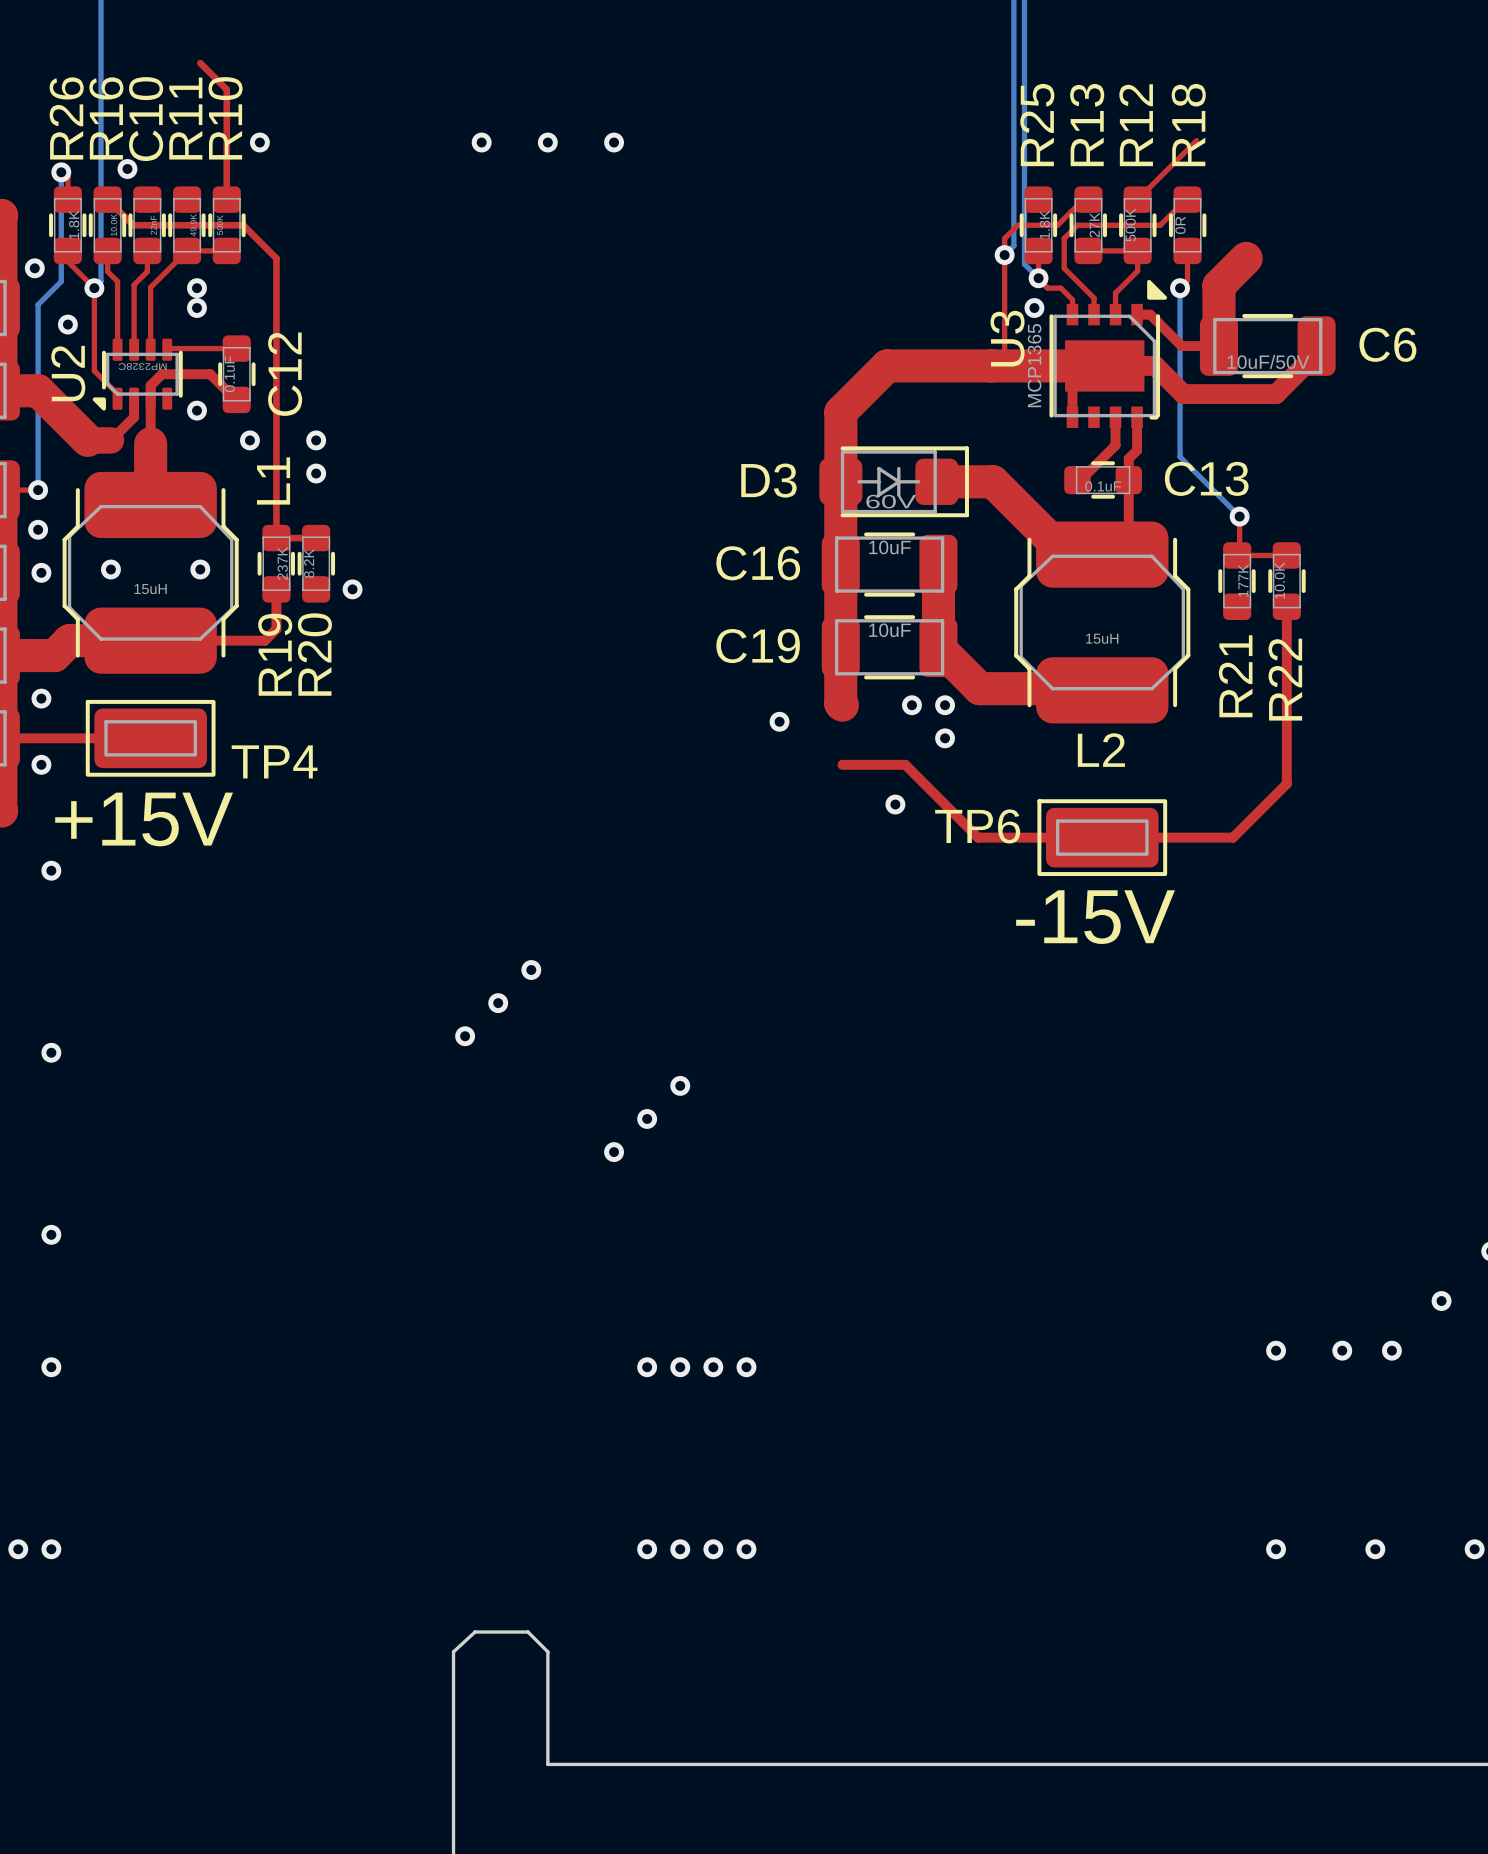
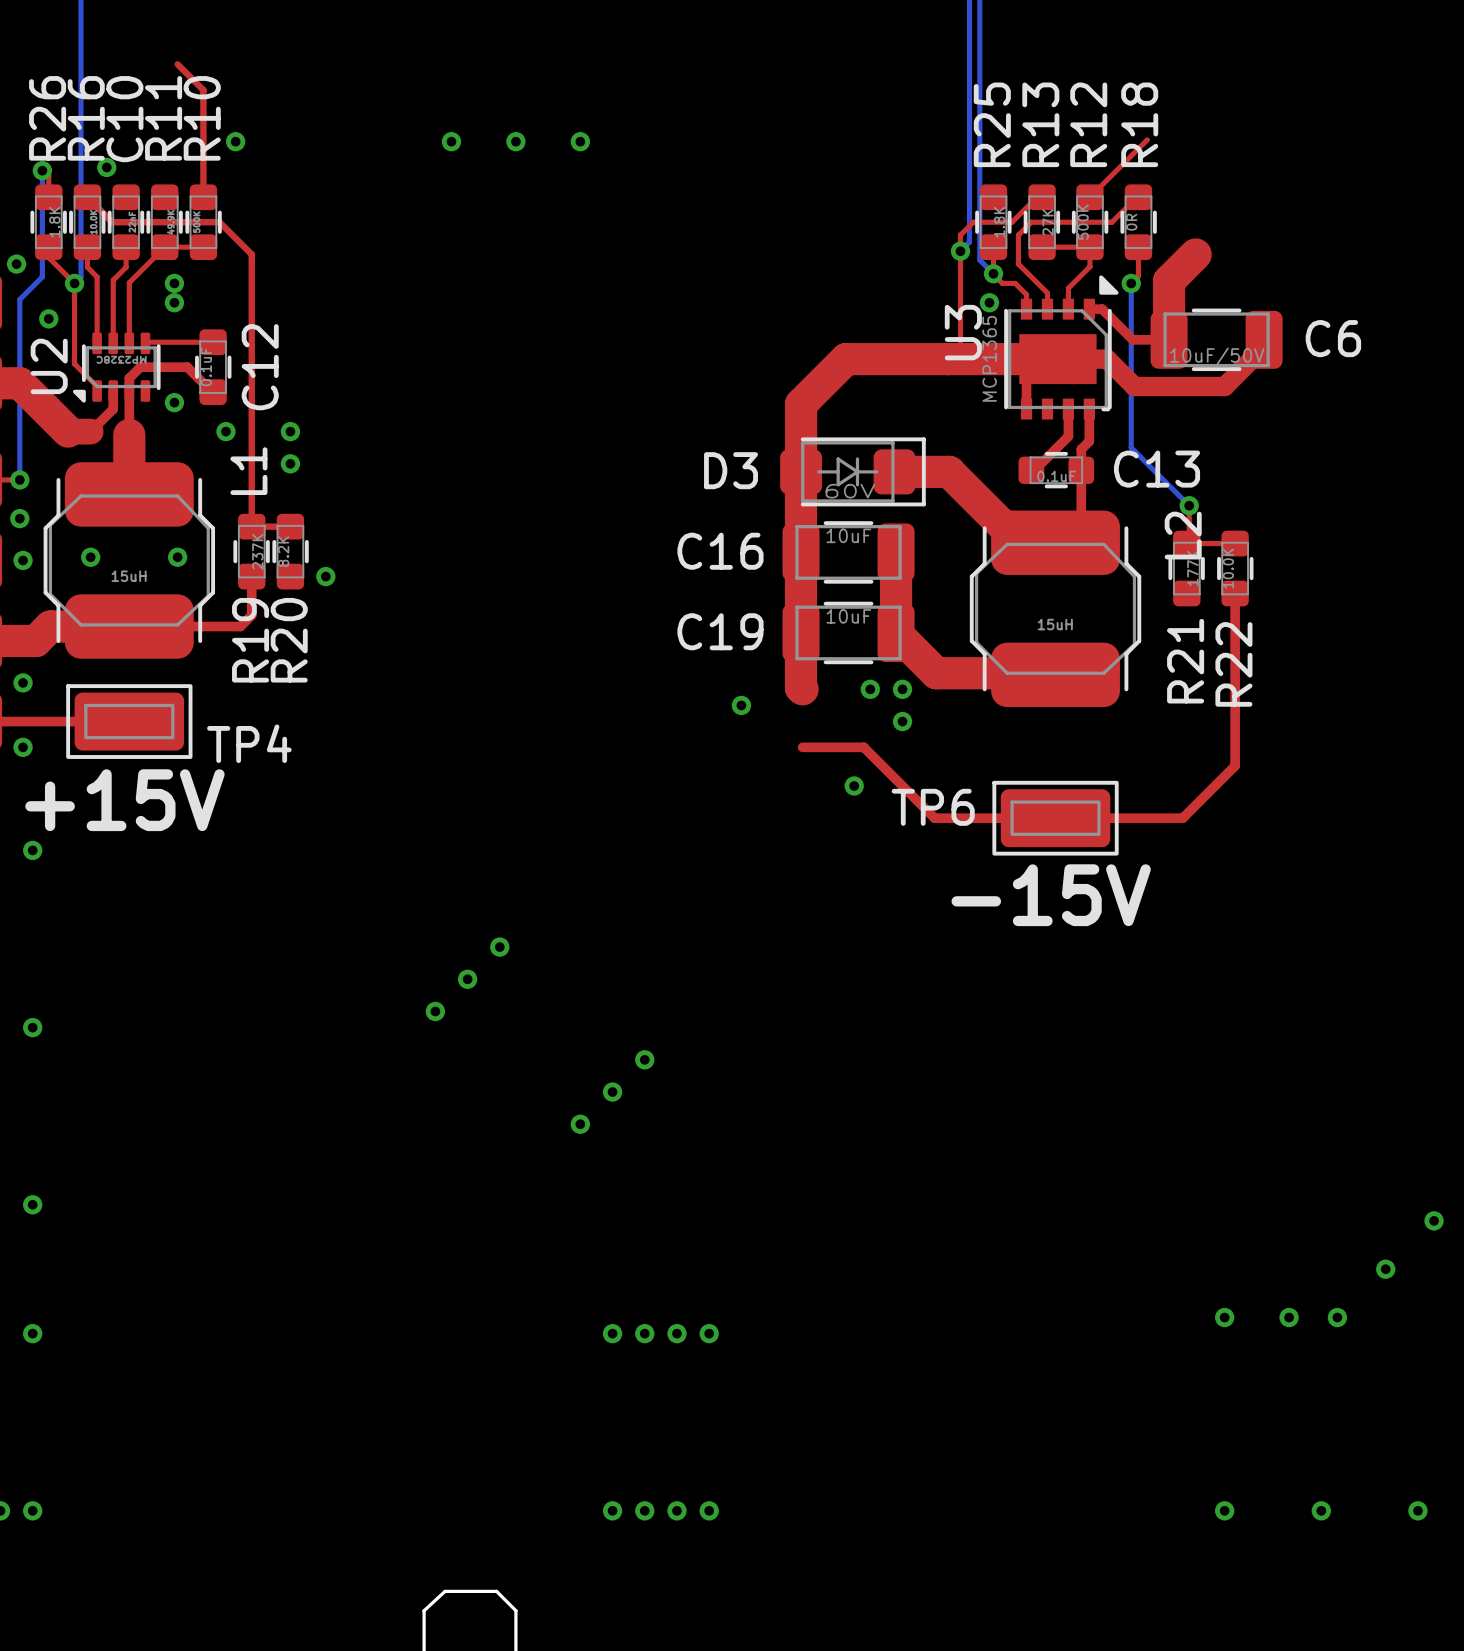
L2 name rotation: 0° (1101, 750) -> 90° counterclockwise (1183, 535)
L2 name position: L2 (1101, 750) -> L2 (1183, 535)

